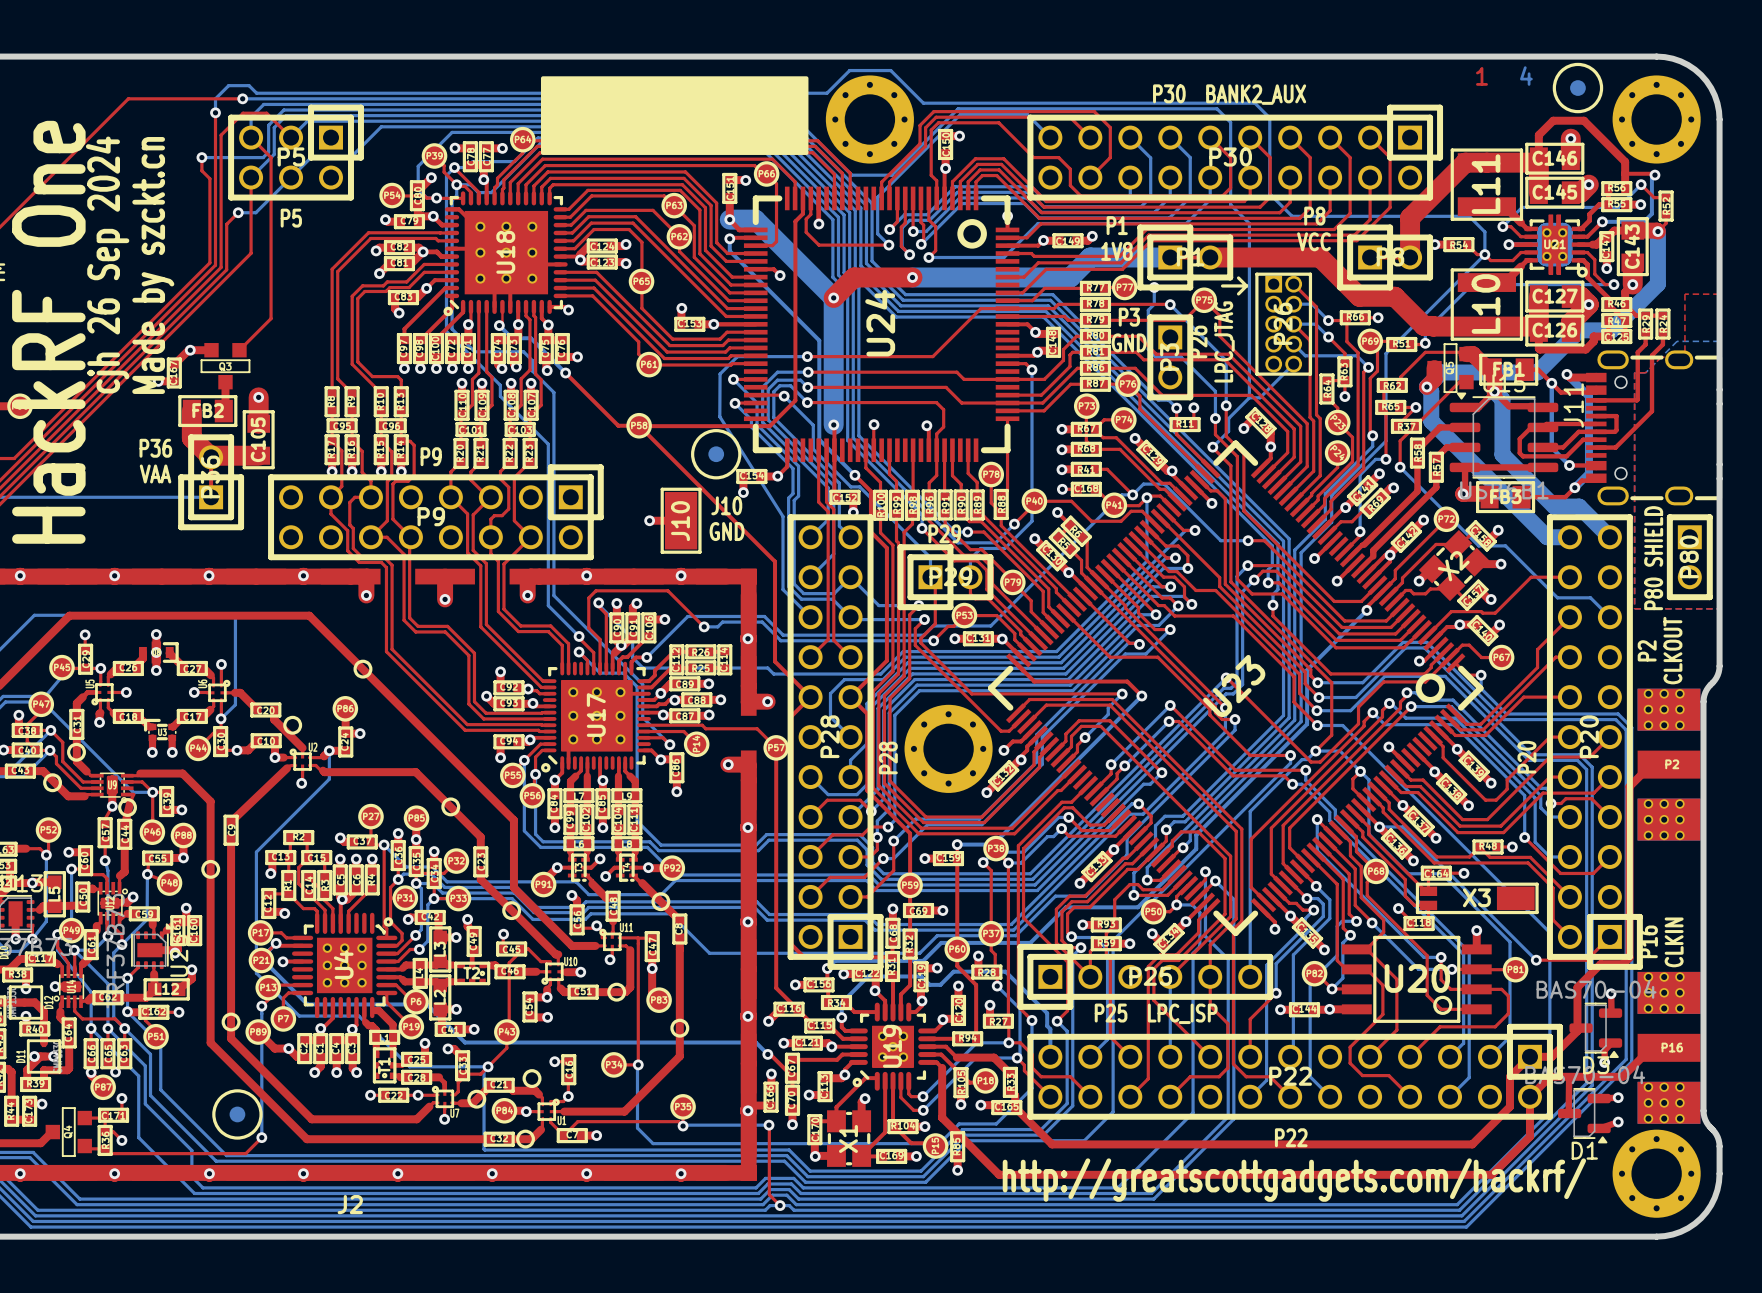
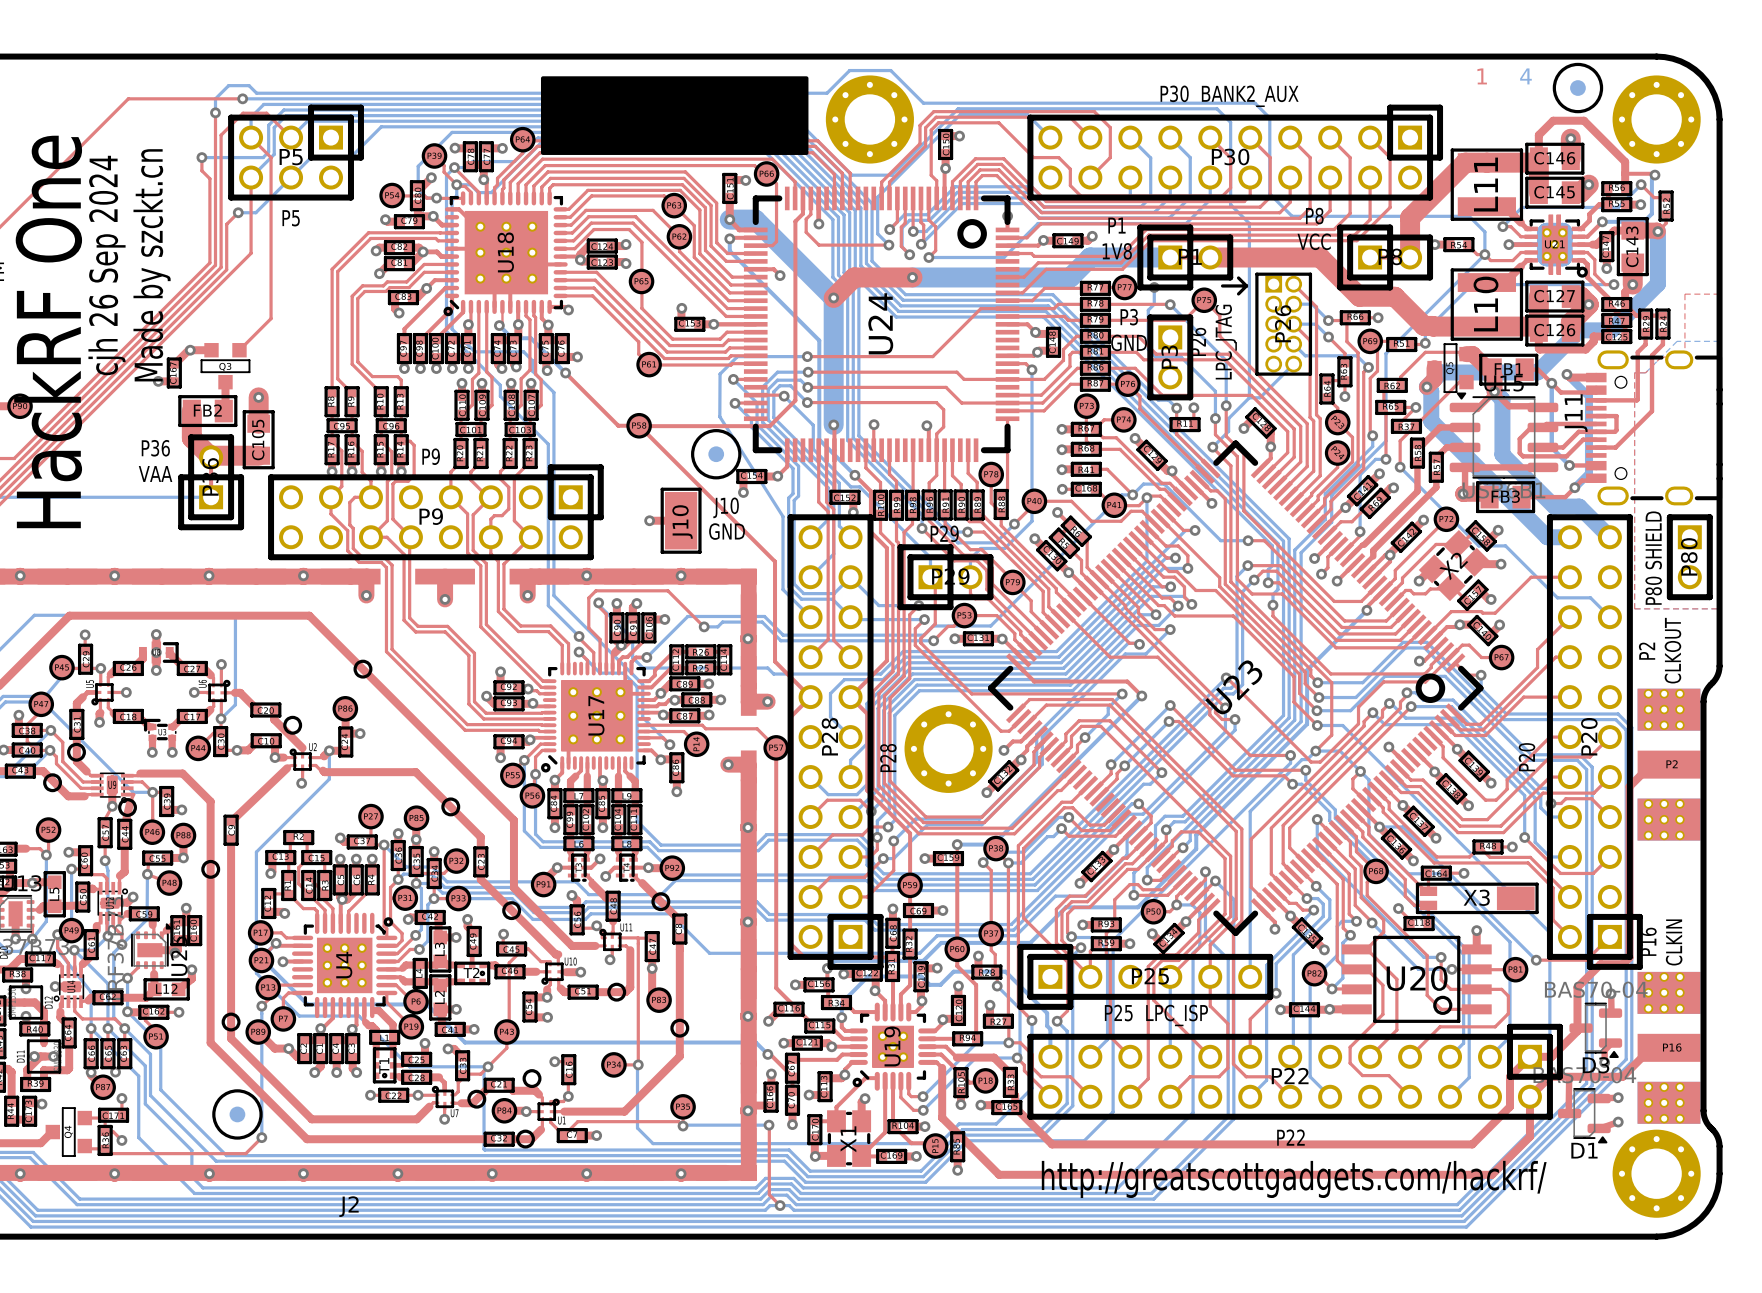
top track: none -> (1338, 546) (1327, 557) (1327, 567) (1321, 574)
via: none -> (1321, 574)

